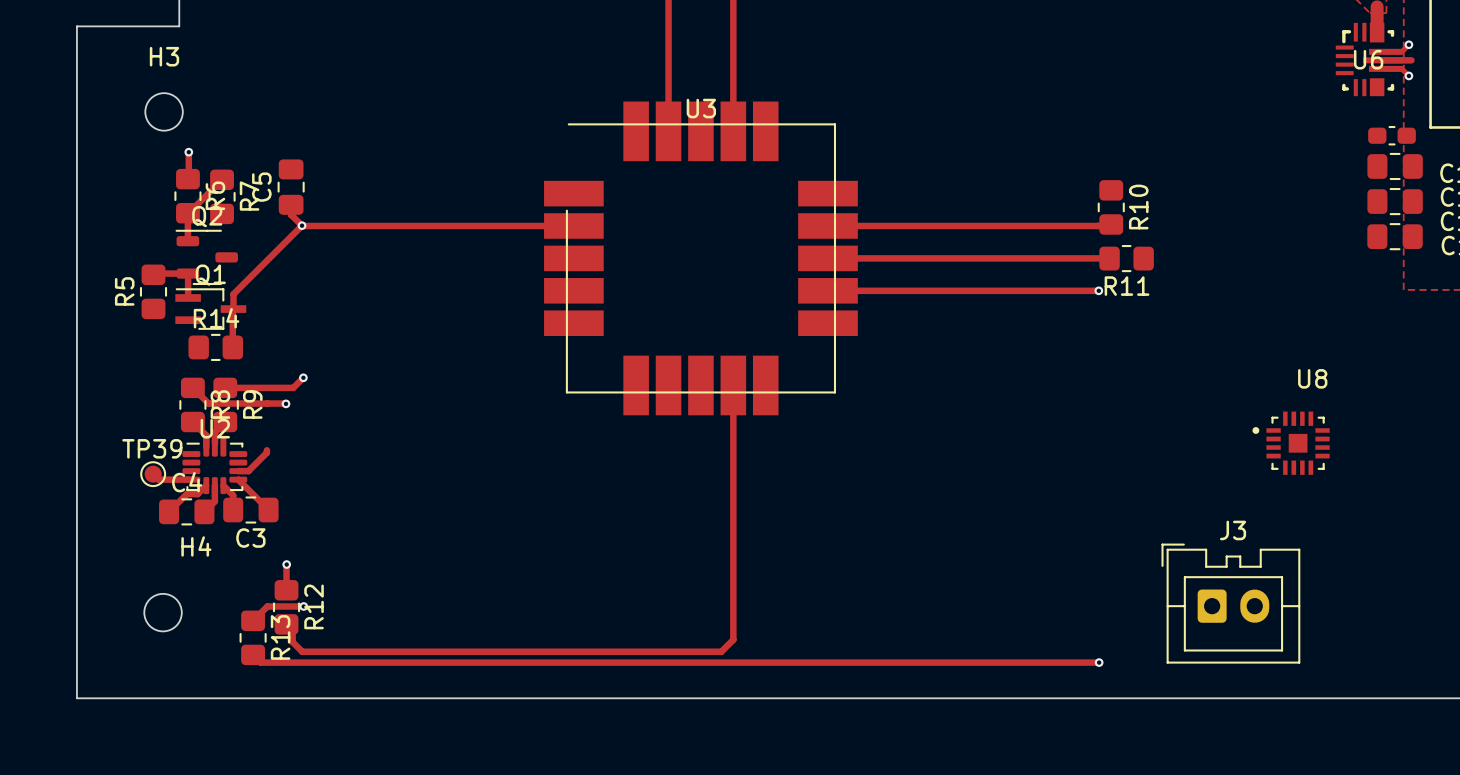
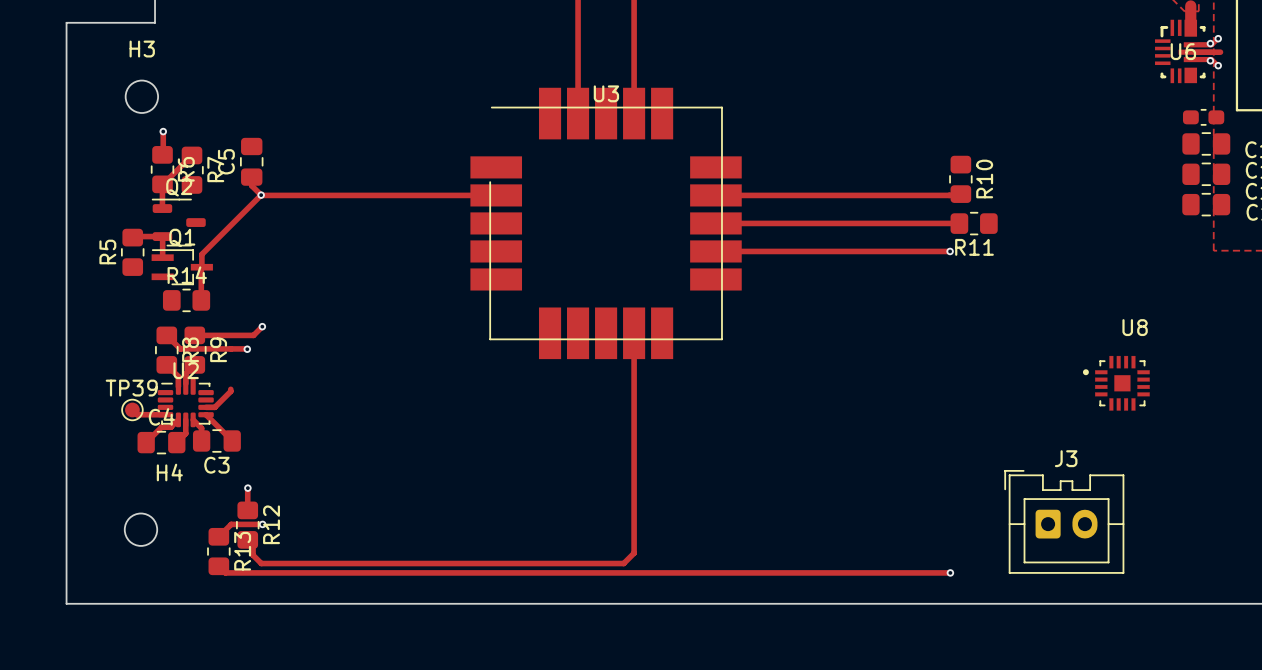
via: none -> (1210, 43)
via: none -> (1210, 60)

